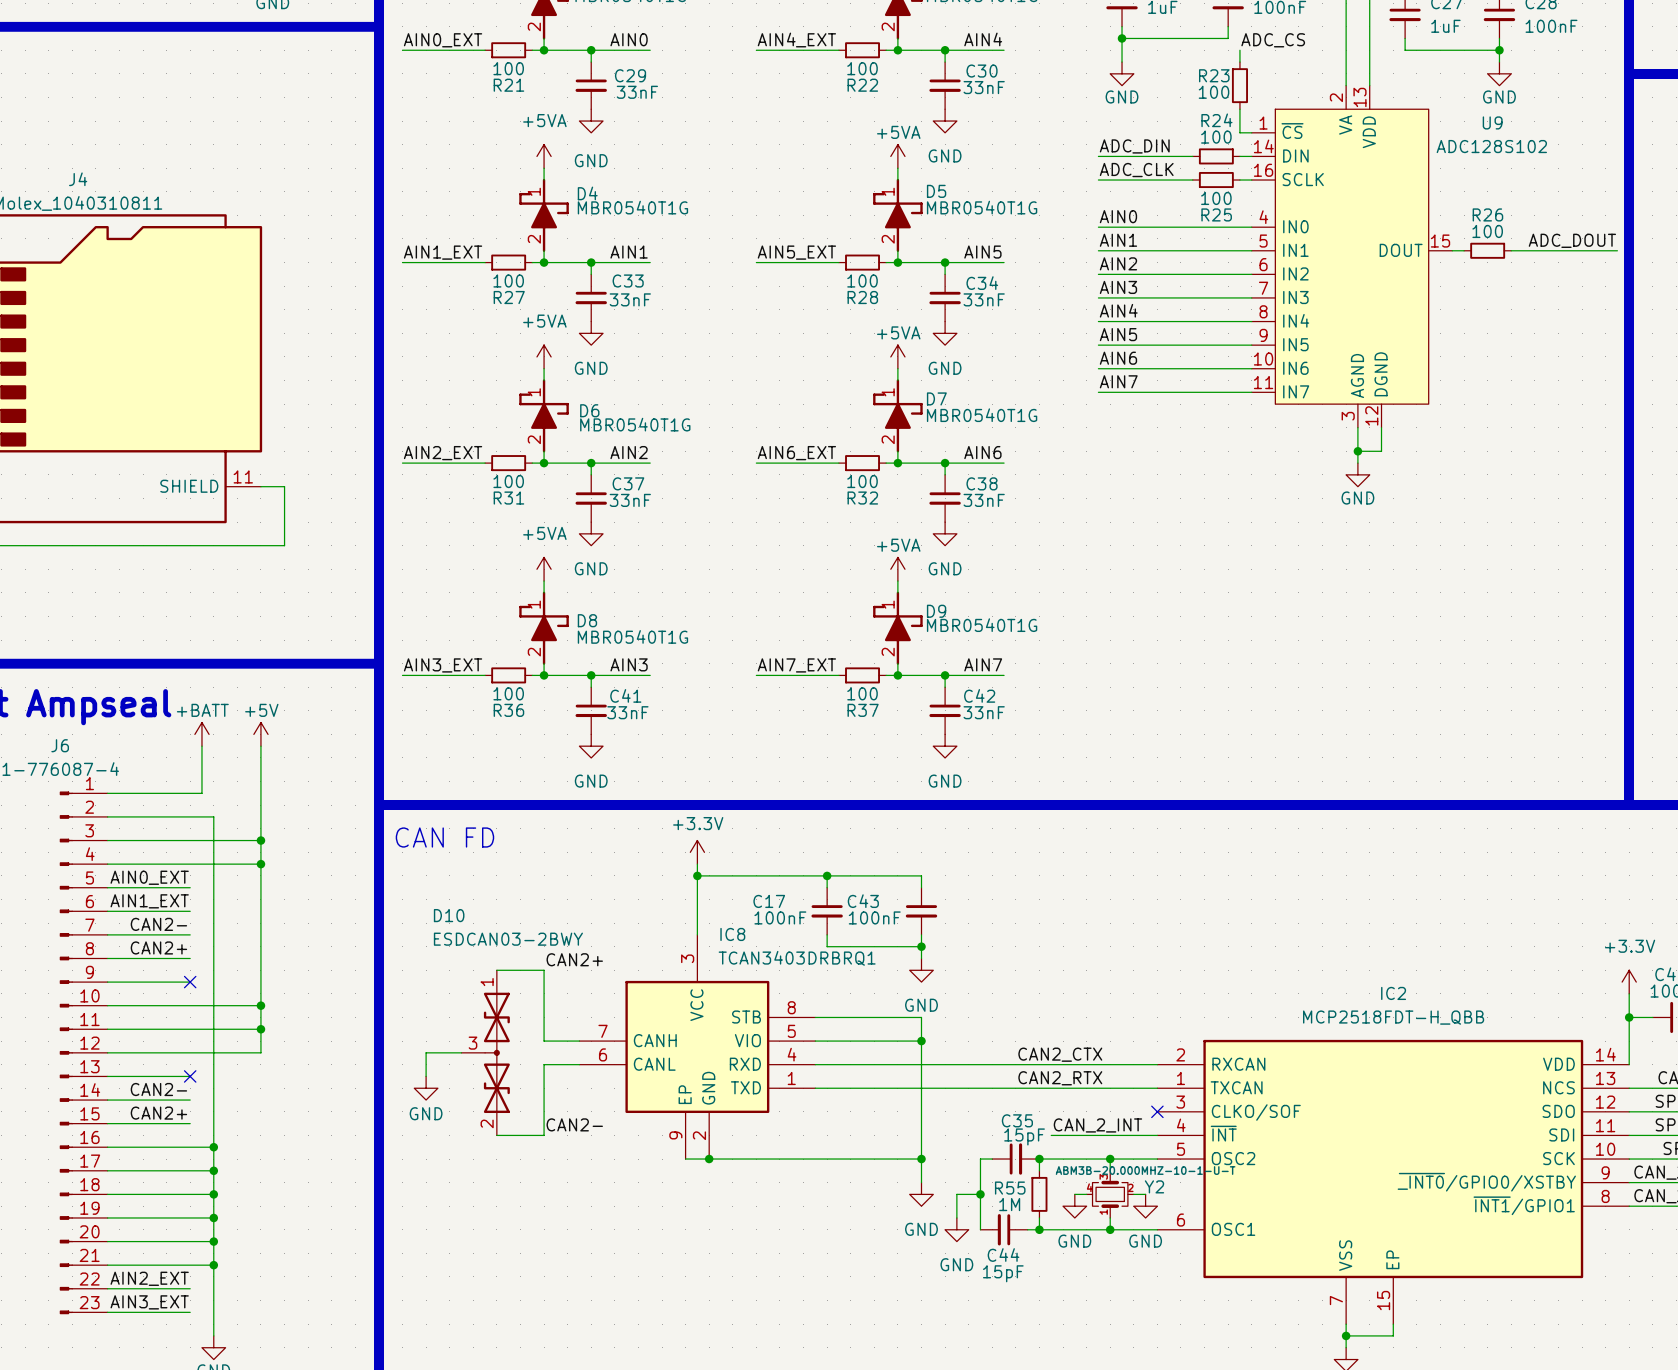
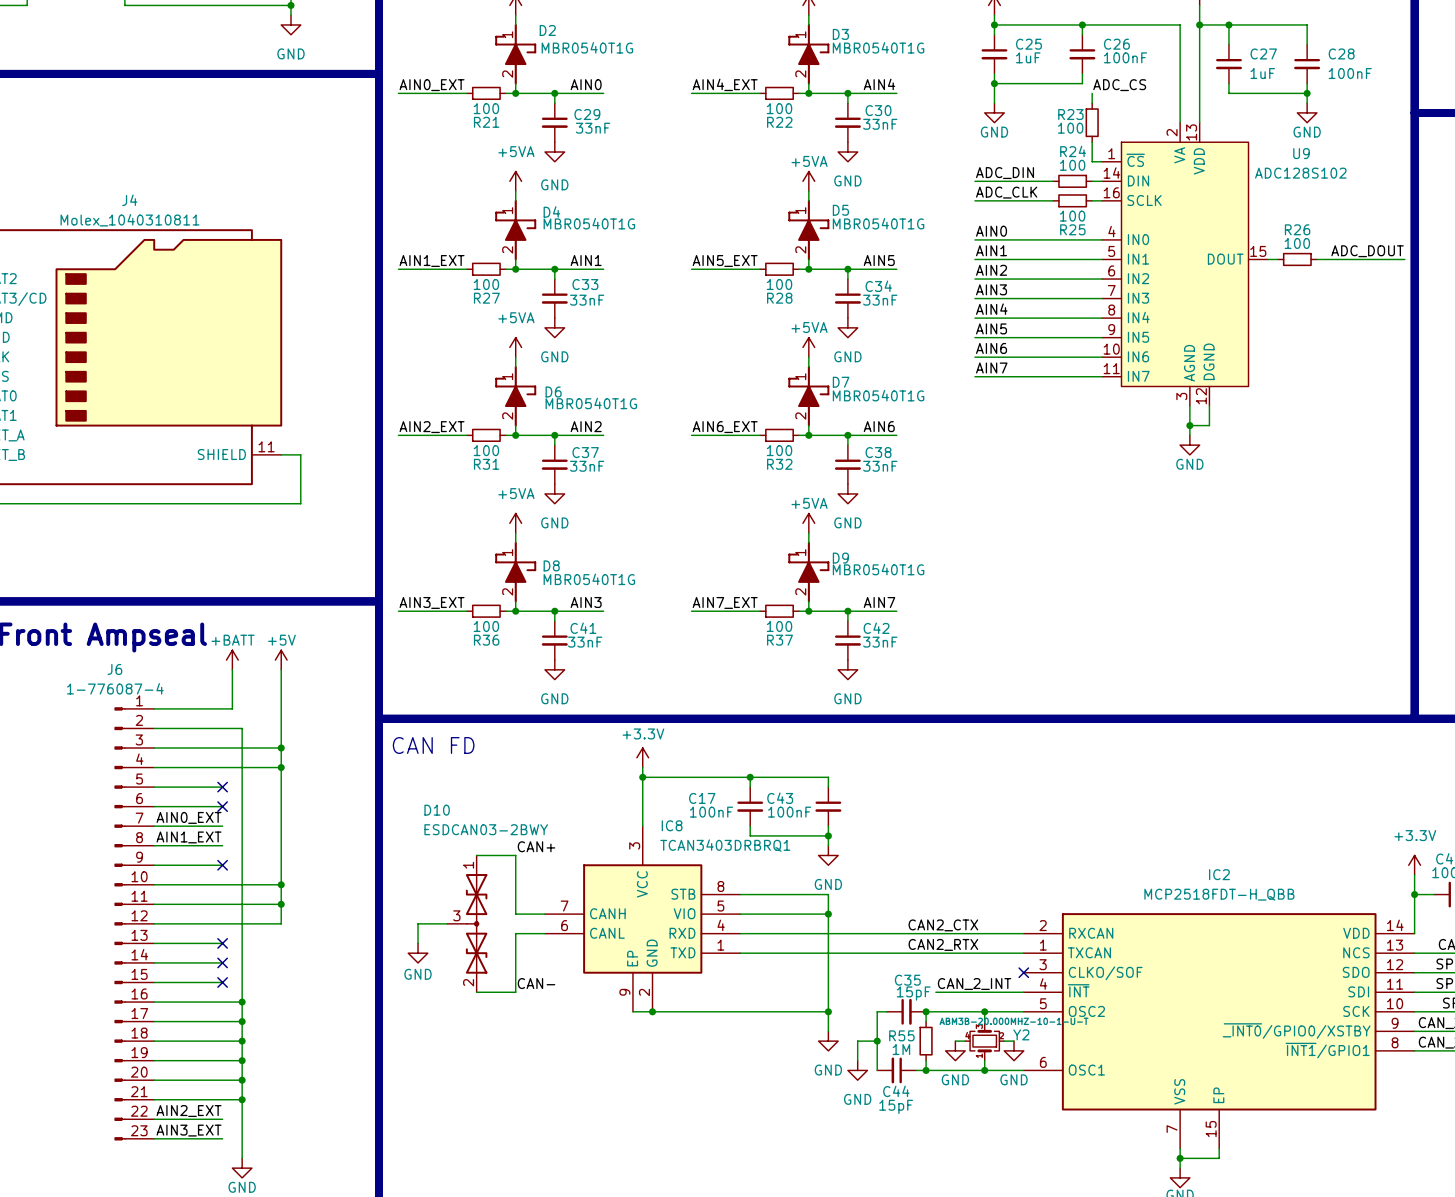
label: AIN0_EXT (149, 877) -> none
no-connect mark: none -> (222, 787)
label: AIN1_EXT (149, 901) -> none
no-connect mark: none -> (222, 806)
label: CAN2- (158, 924) -> AIN0_EXT (189, 817)
label: CAN2+ (158, 947) -> AIN1_EXT (189, 837)
label: CAN2+ (574, 959) -> CAN+ (536, 846)
label: CAN2- (158, 1089) -> none
no-connect mark: none -> (222, 962)
label: CAN2+ (158, 1113) -> none
no-connect mark: none -> (222, 982)
label: CAN2- (574, 1124) -> CAN- (536, 983)

